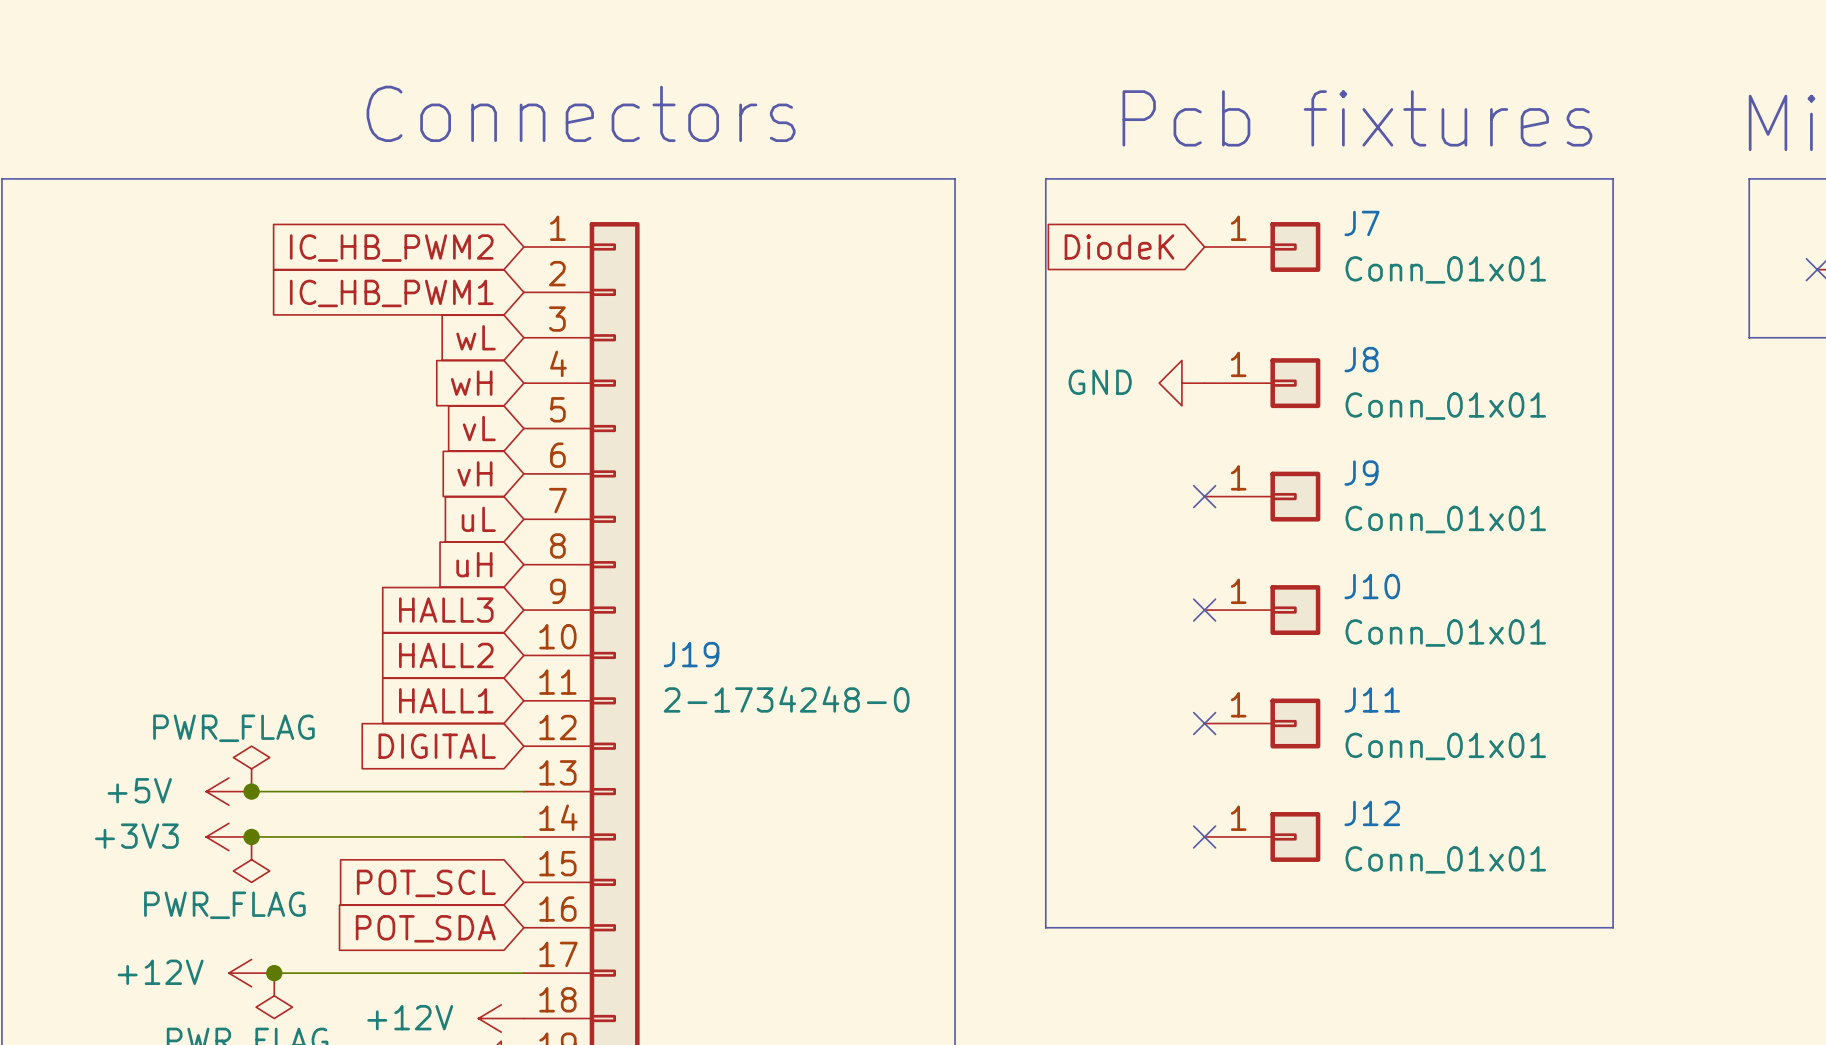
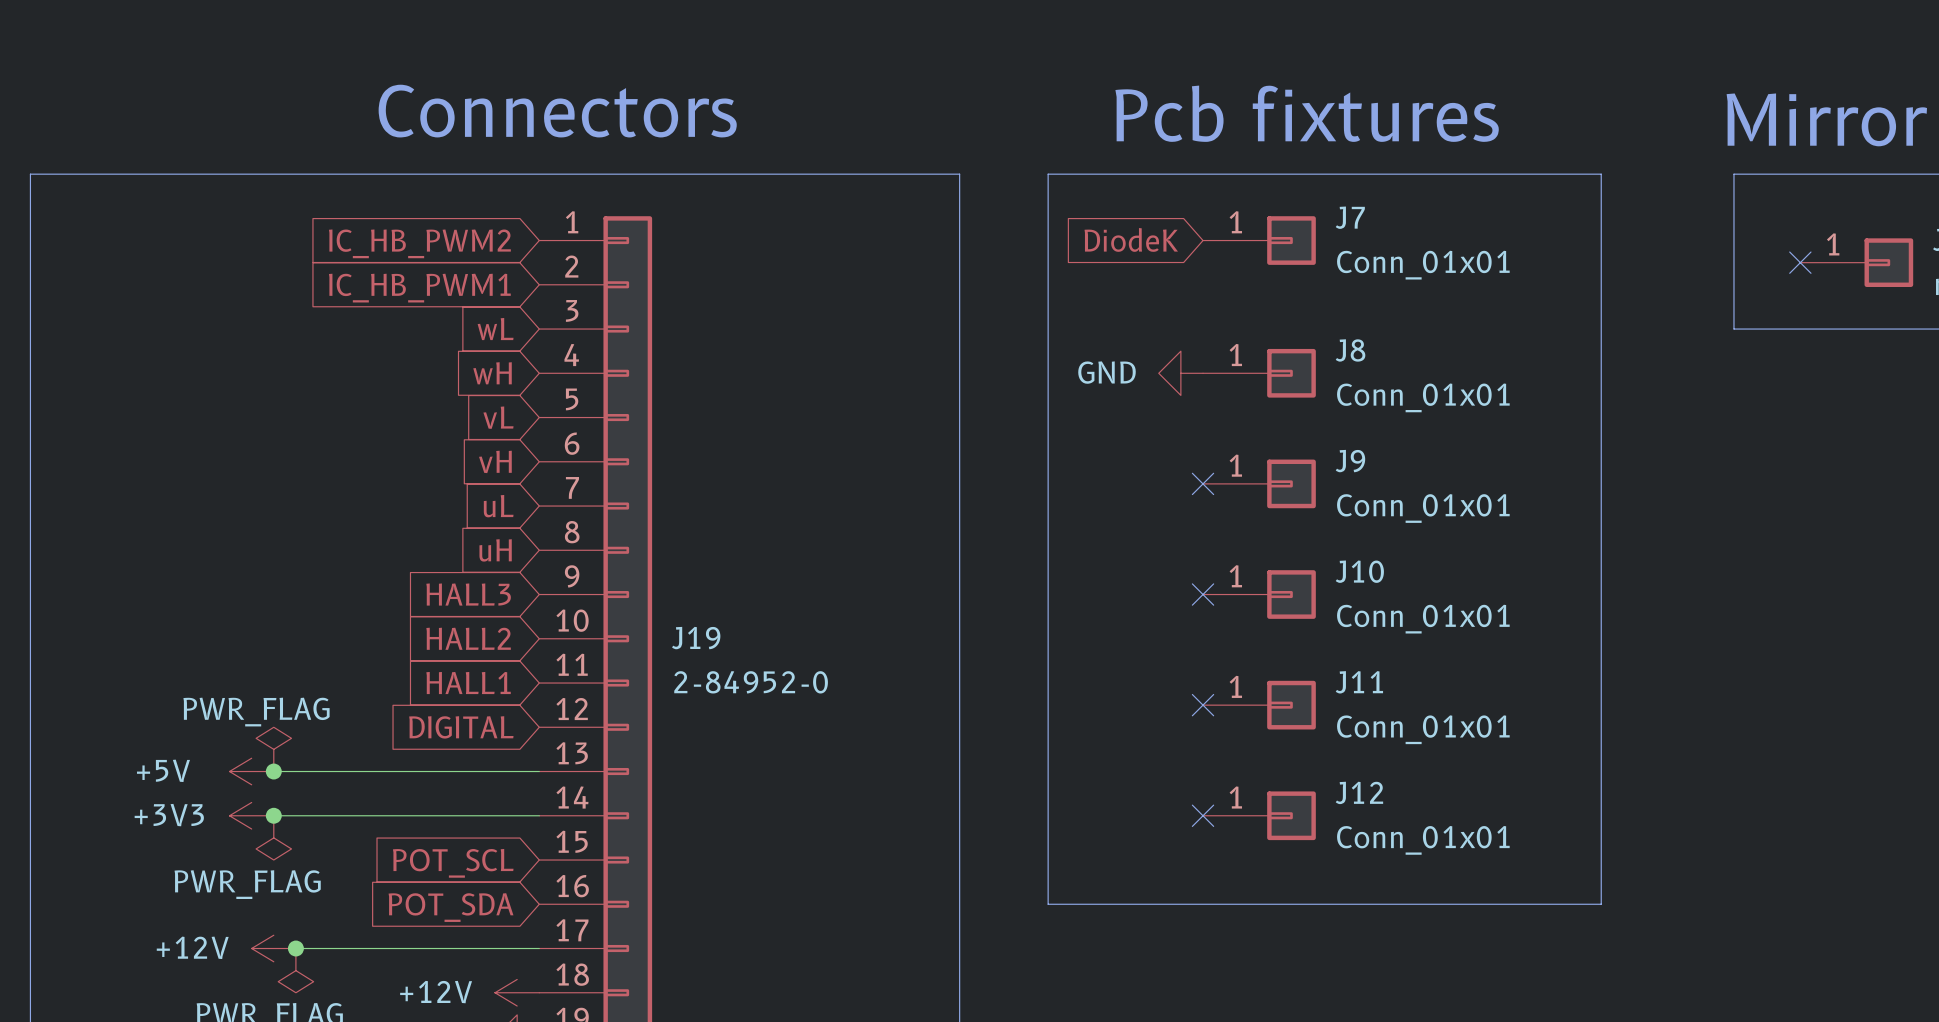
J19 value: 2-1734248-0 (786, 699) -> 2-84952-0 (751, 682)

